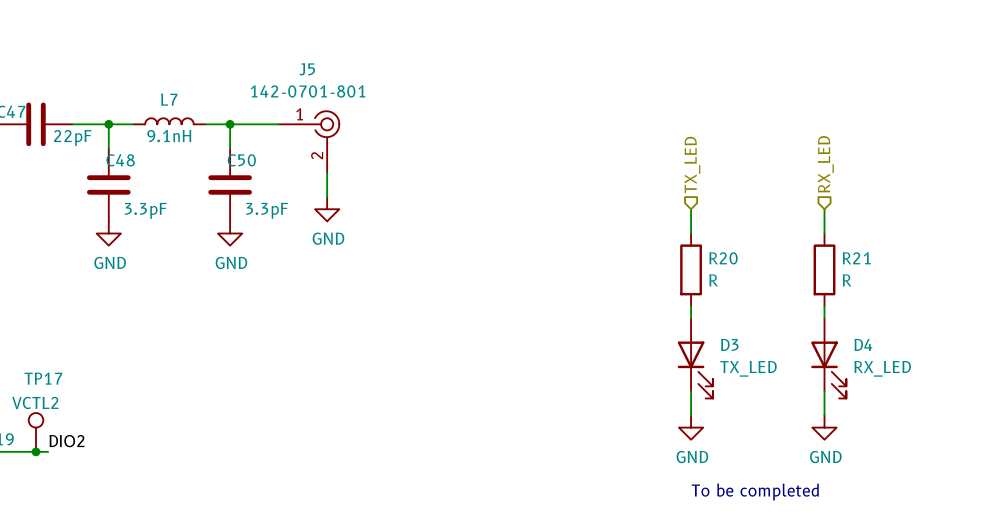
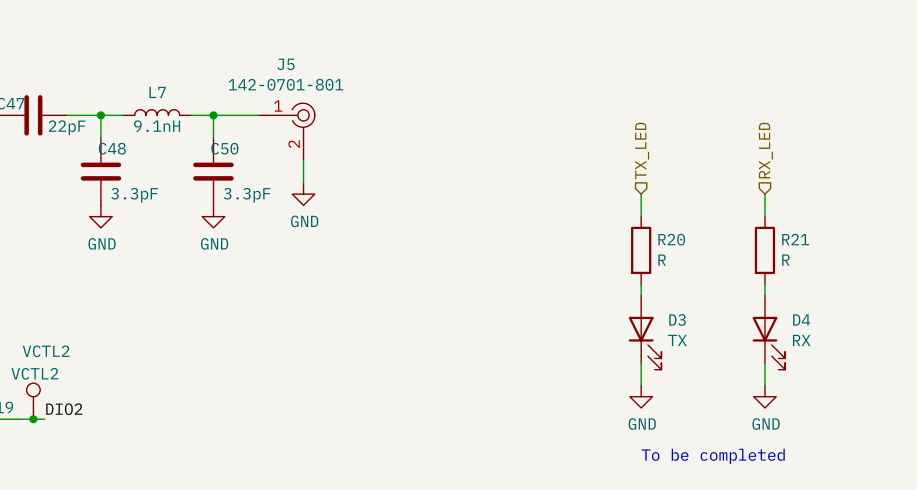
D3 value: TX_LED (748, 368) -> TX (677, 340)
D4 value: RX_LED (882, 368) -> RX (801, 340)
TP17 name: TP17 (43, 378) -> VCTL2 (46, 351)

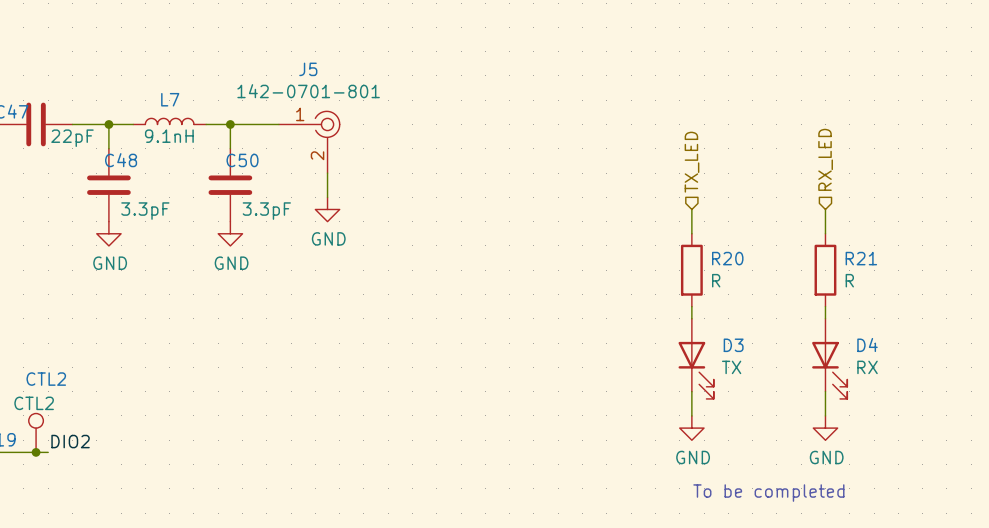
VCTL2 name: VCTL2 (46, 351) -> CTL2 (46, 379)
VCTL2 value: VCTL2 (34, 373) -> CTL2 (34, 403)

